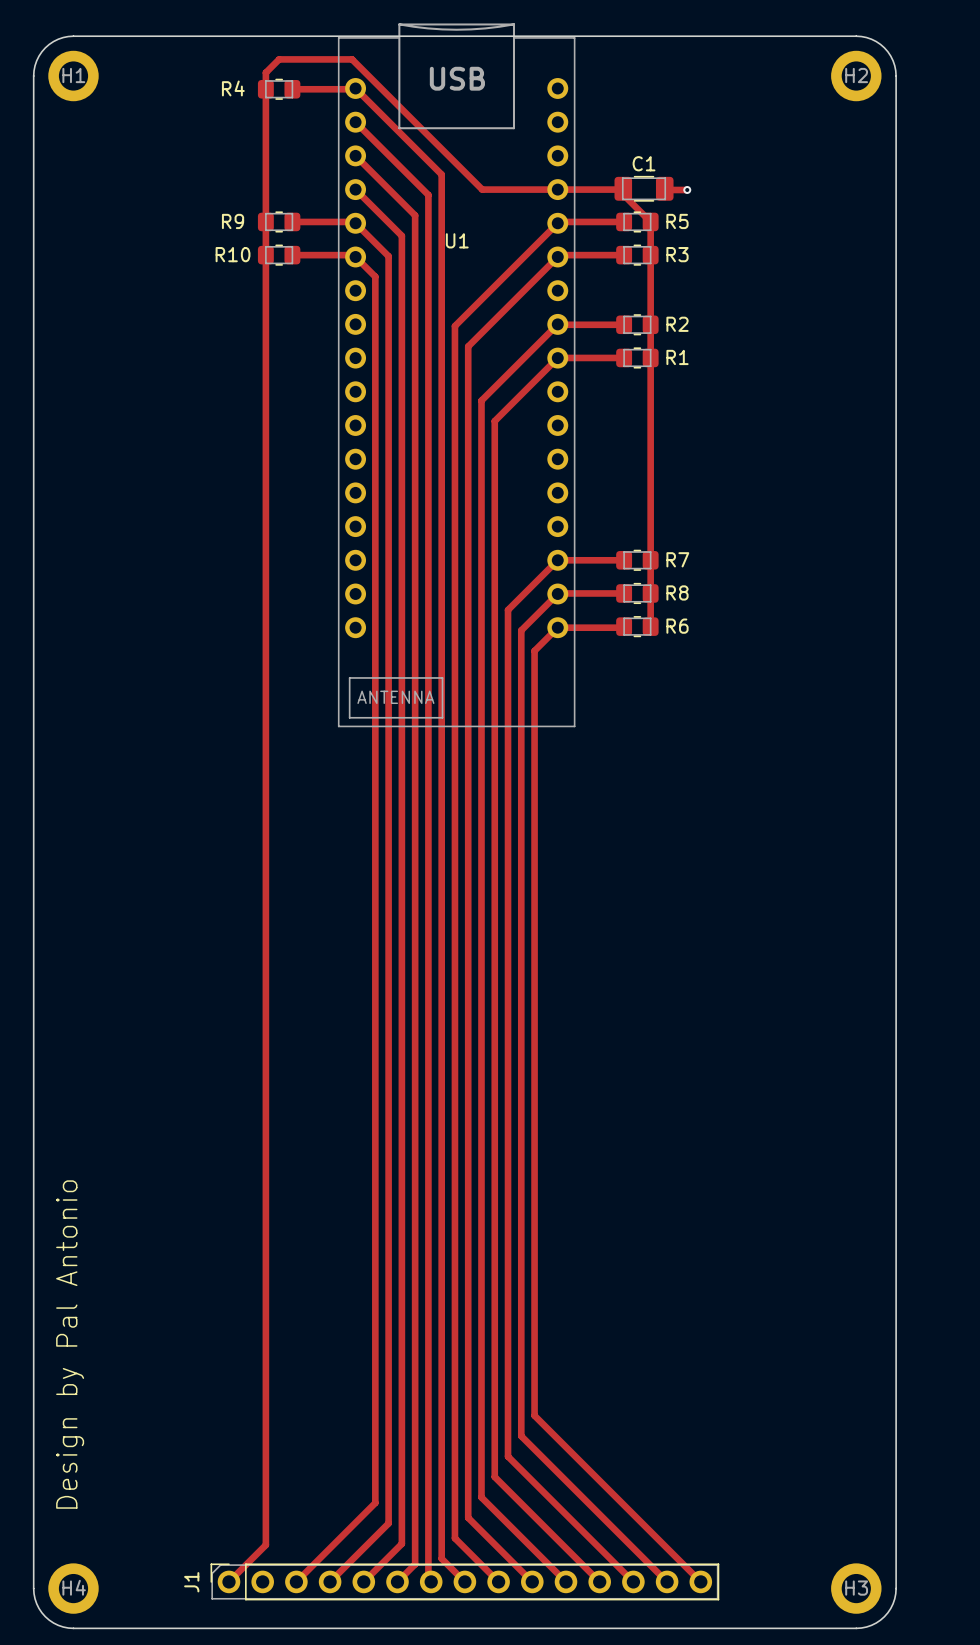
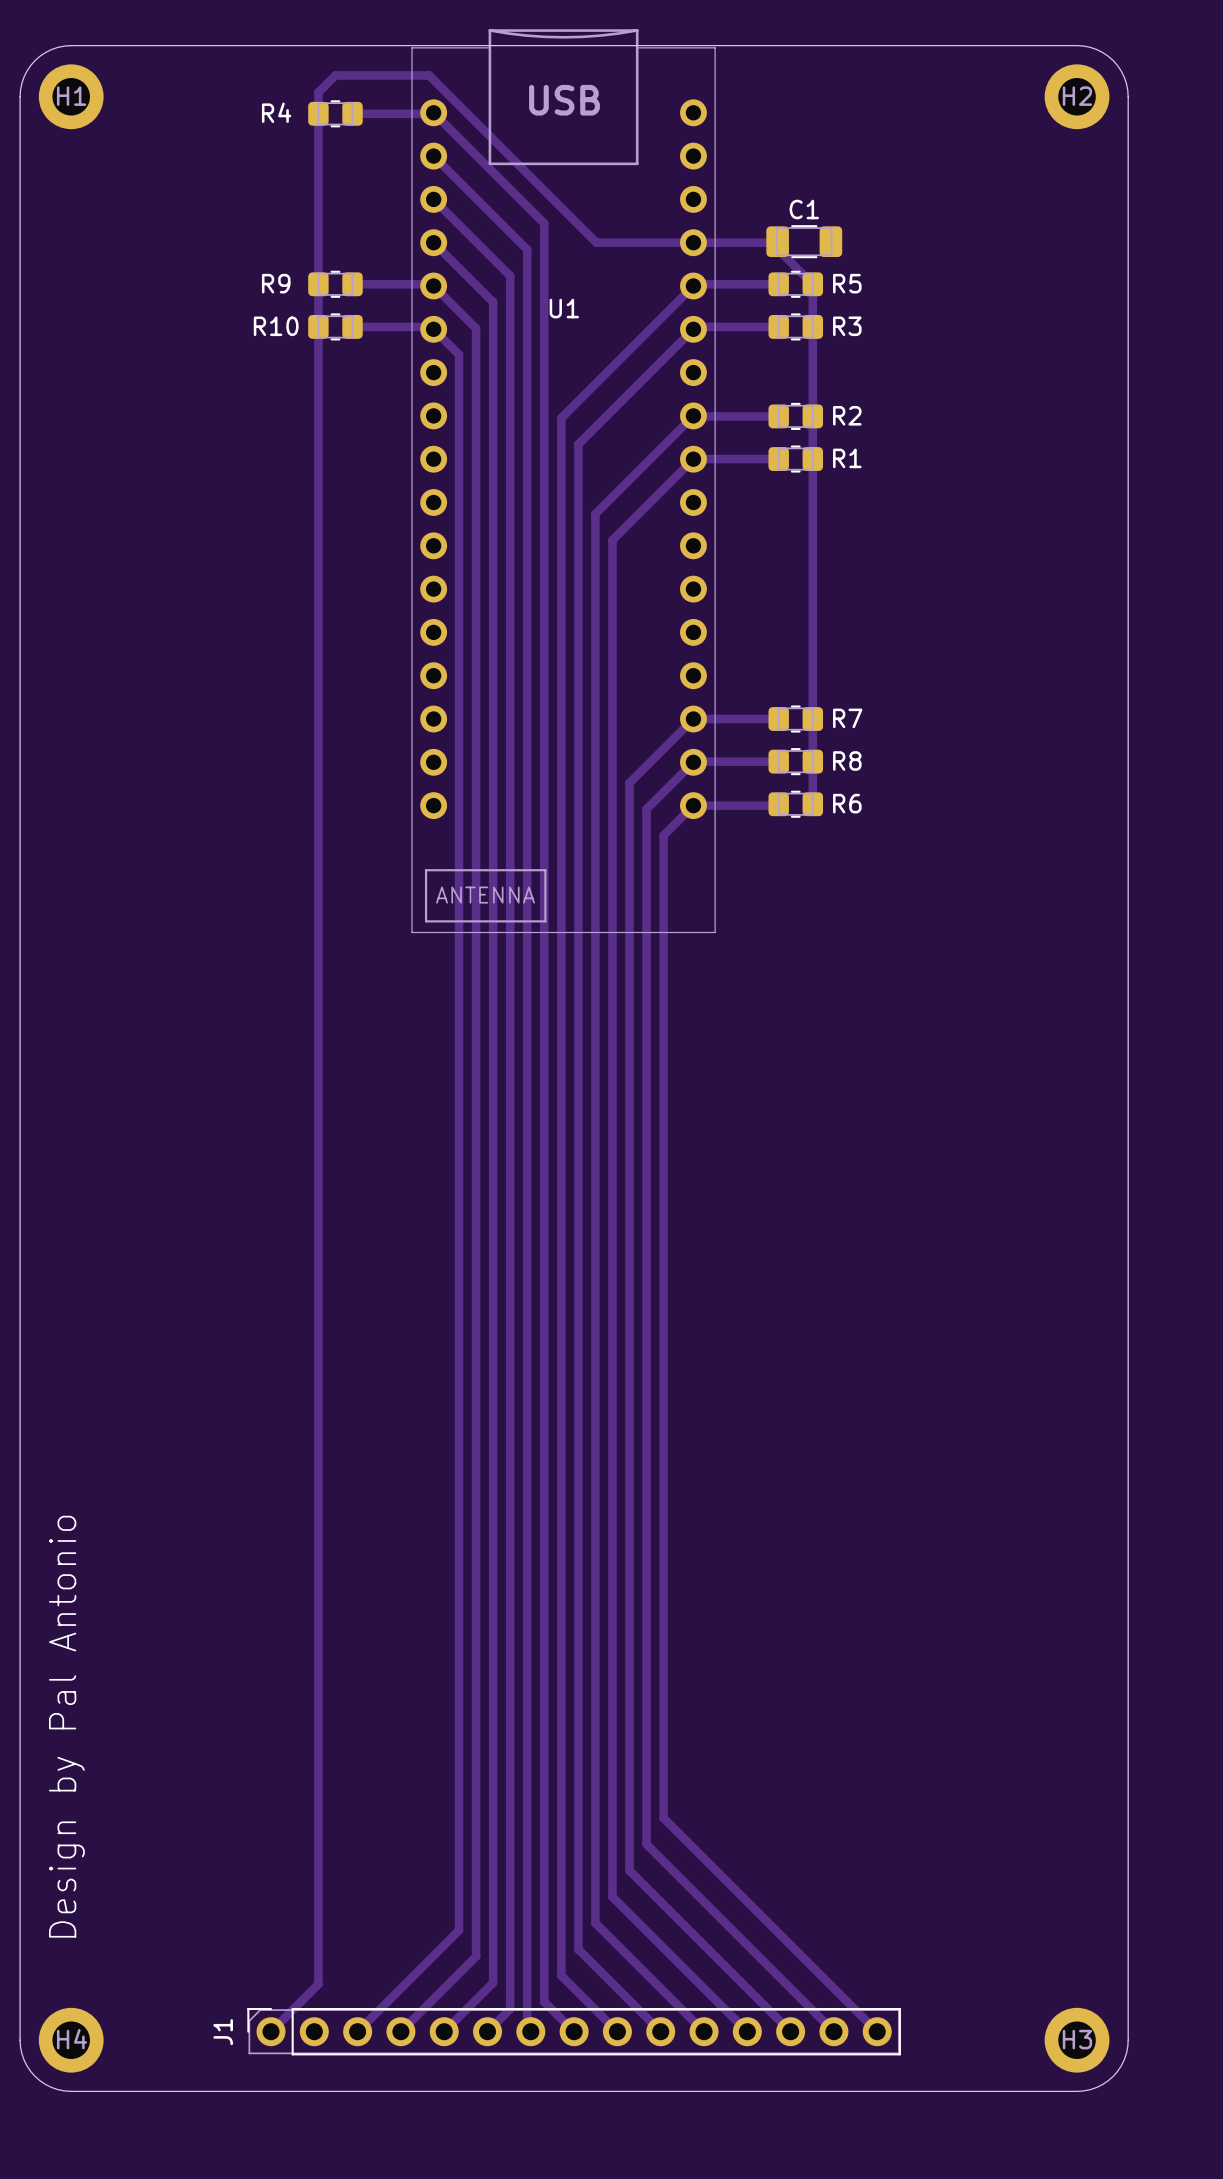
track: (664, 188) (687, 189) -> none
via: (687, 189) -> none

